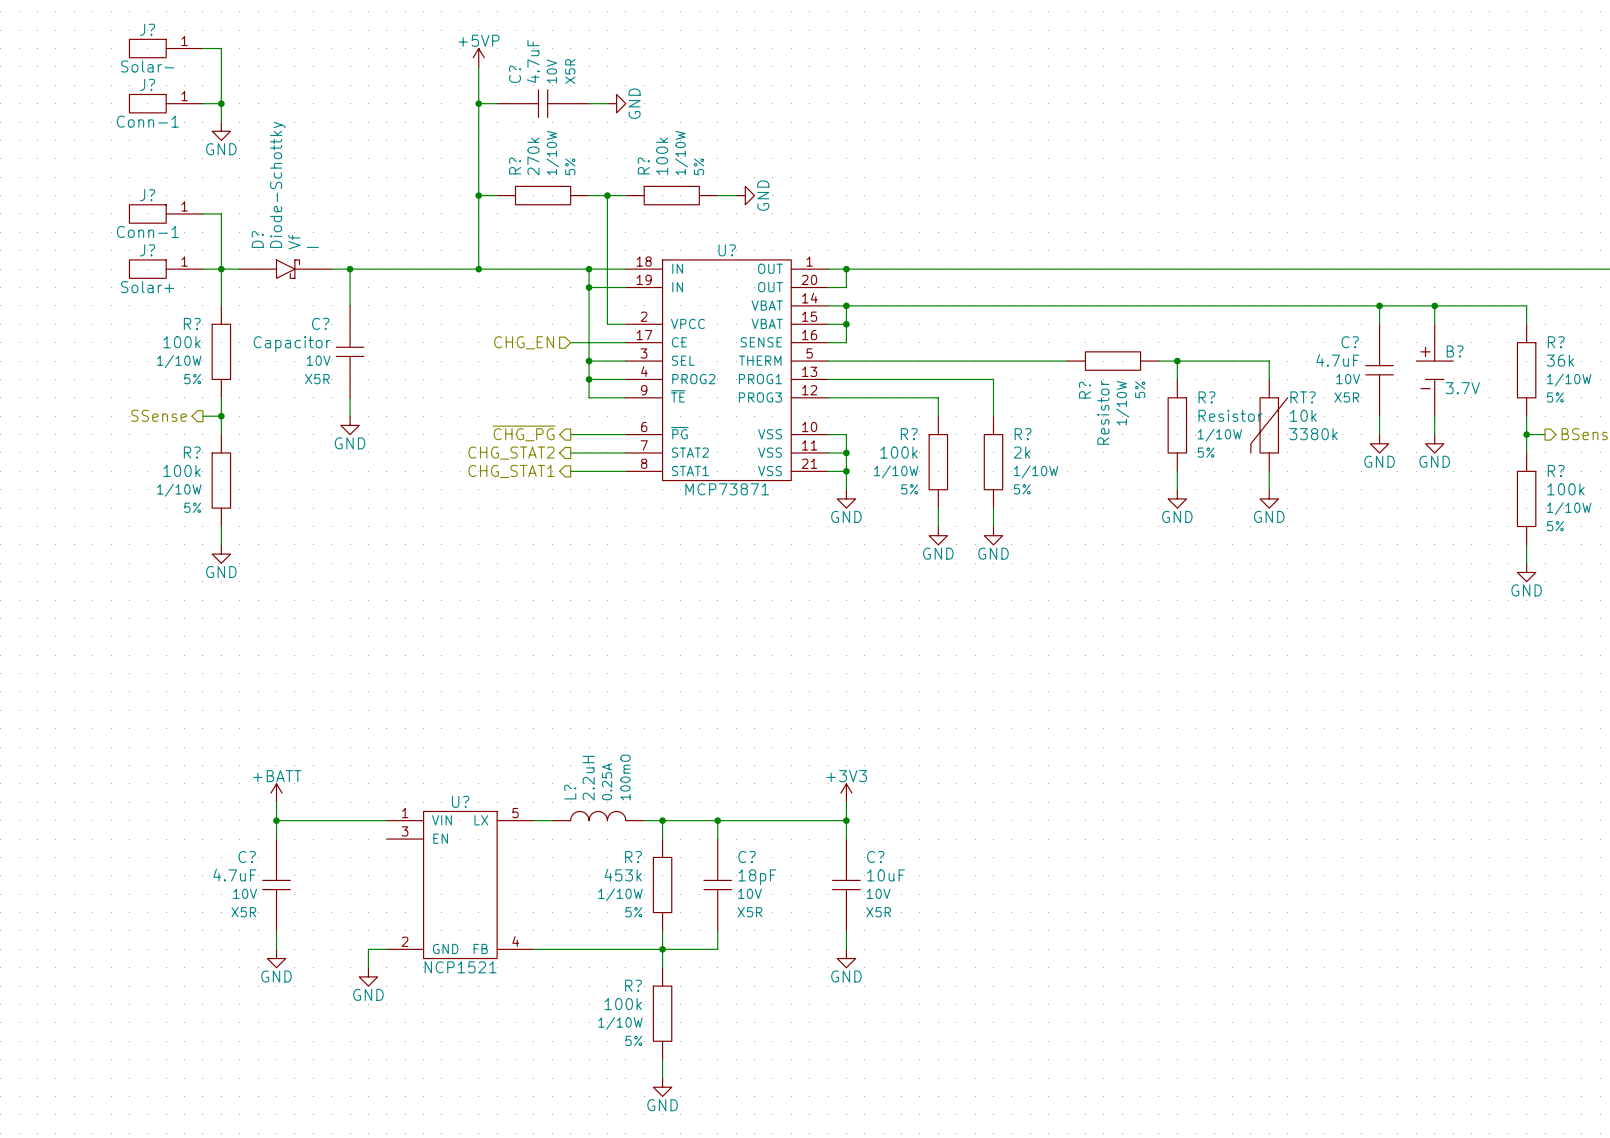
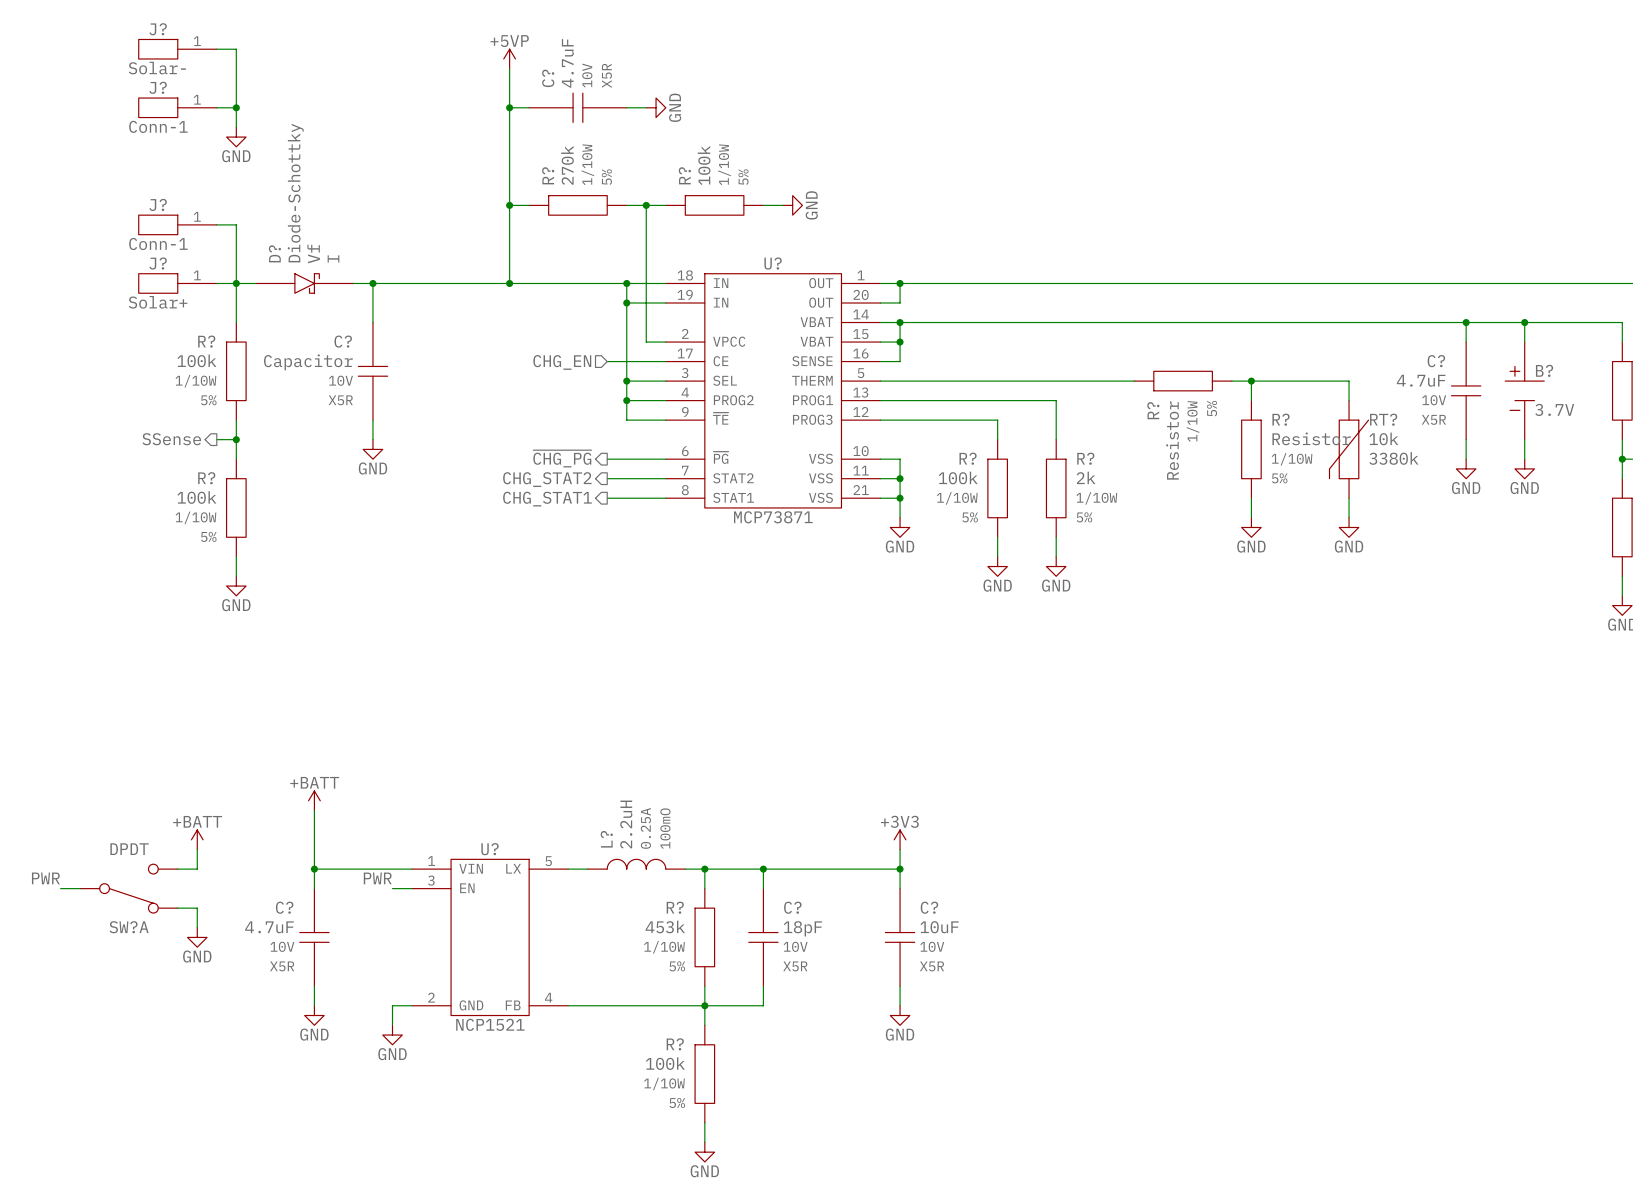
wire: none -> (314, 810) (314, 888)
power symbol: none -> +BATT (197, 839)
power symbol position: +BATT (276, 793) -> +BATT (314, 800)
wire: none -> (197, 849) (197, 869) (177, 869)
wire: (276, 802) (276, 839) -> none
wire: (276, 820) (294, 820) -> (392, 888) (412, 888)
junction position: (276, 820) -> (314, 869)
label: none -> PWR (45, 878)
label: none -> PWR (377, 878)
wire: none -> (60, 888) (80, 888)
SW?A: none -> DPDT (128, 888)
wire: none -> (177, 908) (197, 908) (197, 927)
power symbol: none -> GND (197, 937)
C? position: (276, 885) -> (314, 937)
wire: (276, 930) (276, 949) -> (314, 986) (314, 1005)
power symbol position: GND (276, 958) -> GND (314, 1015)

